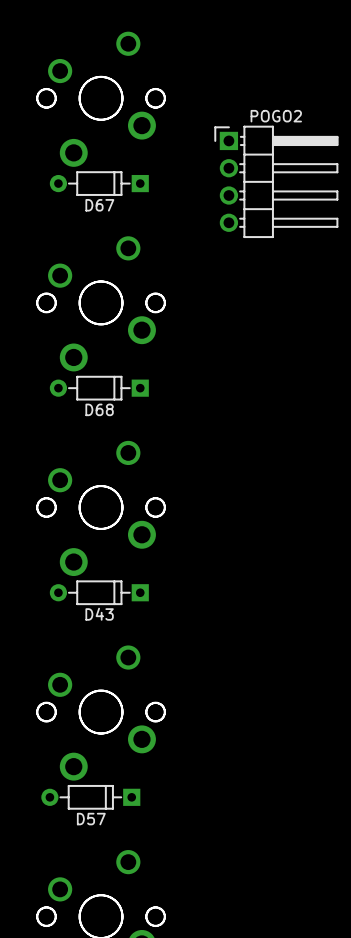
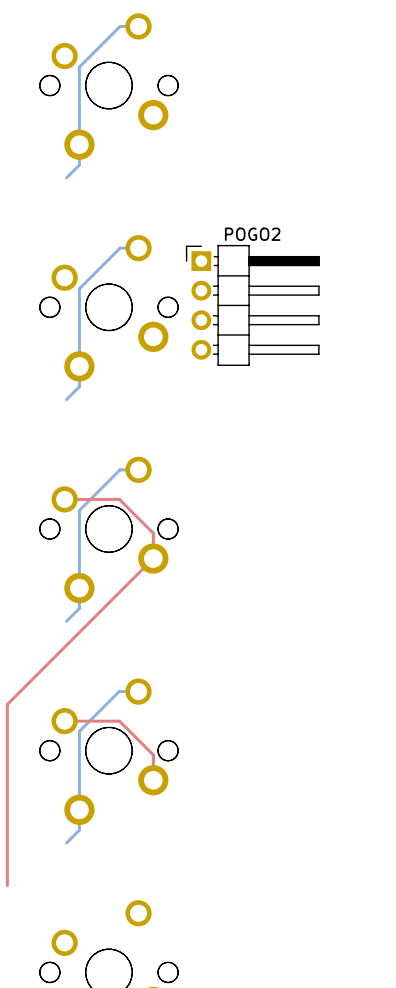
bottom track: none -> (138, 26) (120, 26) (79, 67) (79, 165) (66, 177)
POGO2 position: (276, 181) -> (252, 305)
D67: (99, 183) -> none
bottom track: none -> (138, 248) (120, 248) (79, 288) (79, 386) (66, 399)
D68: (99, 388) -> none
bottom track: none -> (138, 469) (120, 469) (79, 510) (79, 608) (66, 621)
top track: none -> (64, 499) (119, 499) (153, 533) (153, 558) (7, 704) (7, 885)
D43: (99, 592) -> none
bottom track: none -> (138, 691) (119, 691) (79, 731) (79, 830) (66, 843)
top track: none -> (64, 721) (119, 721) (153, 754) (153, 780)
D57: (90, 797) -> none

